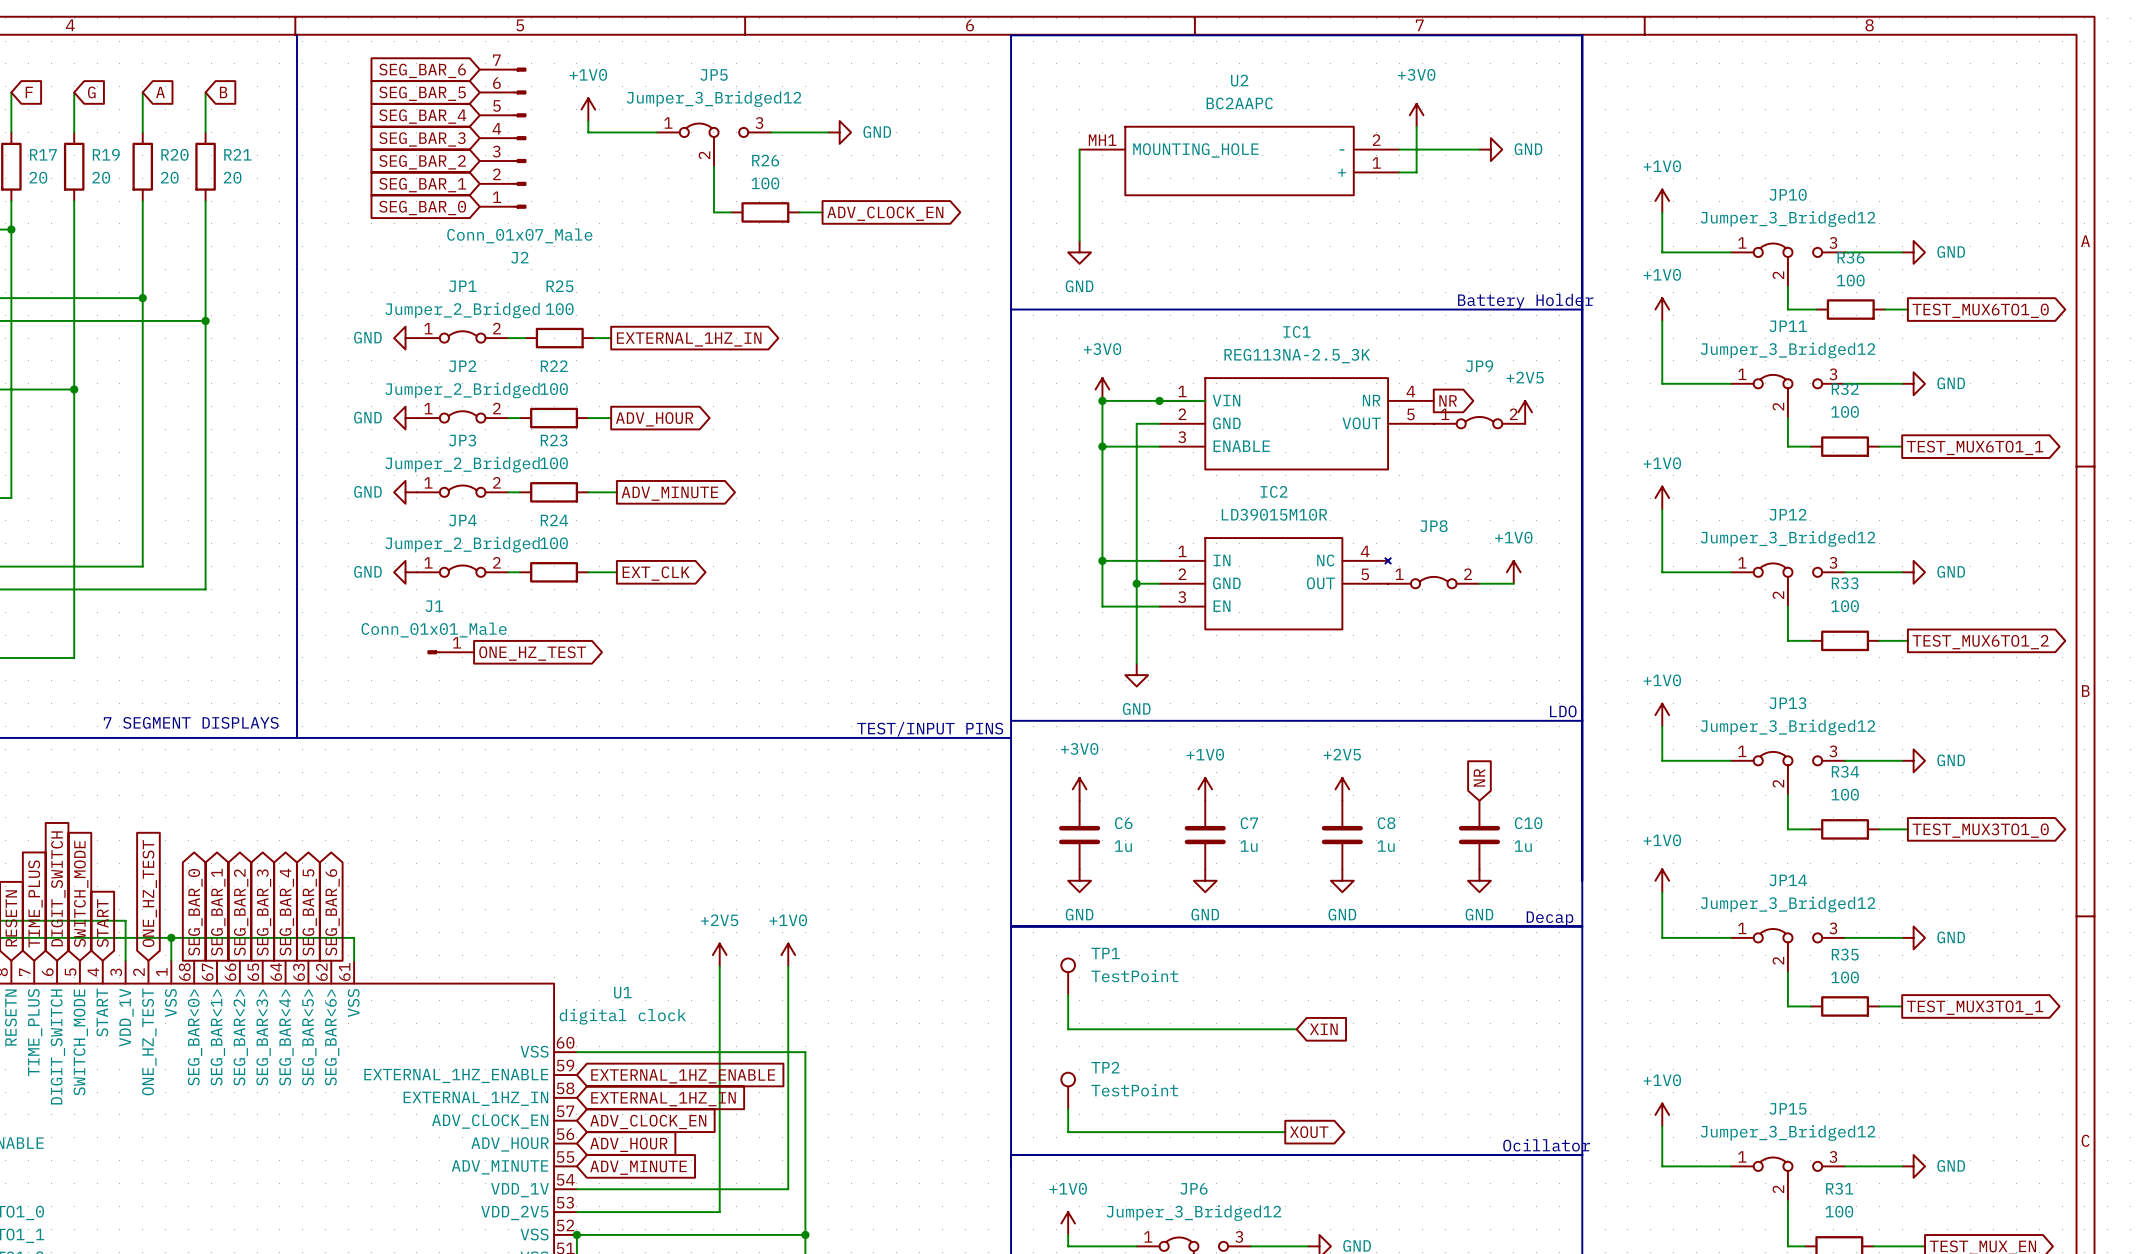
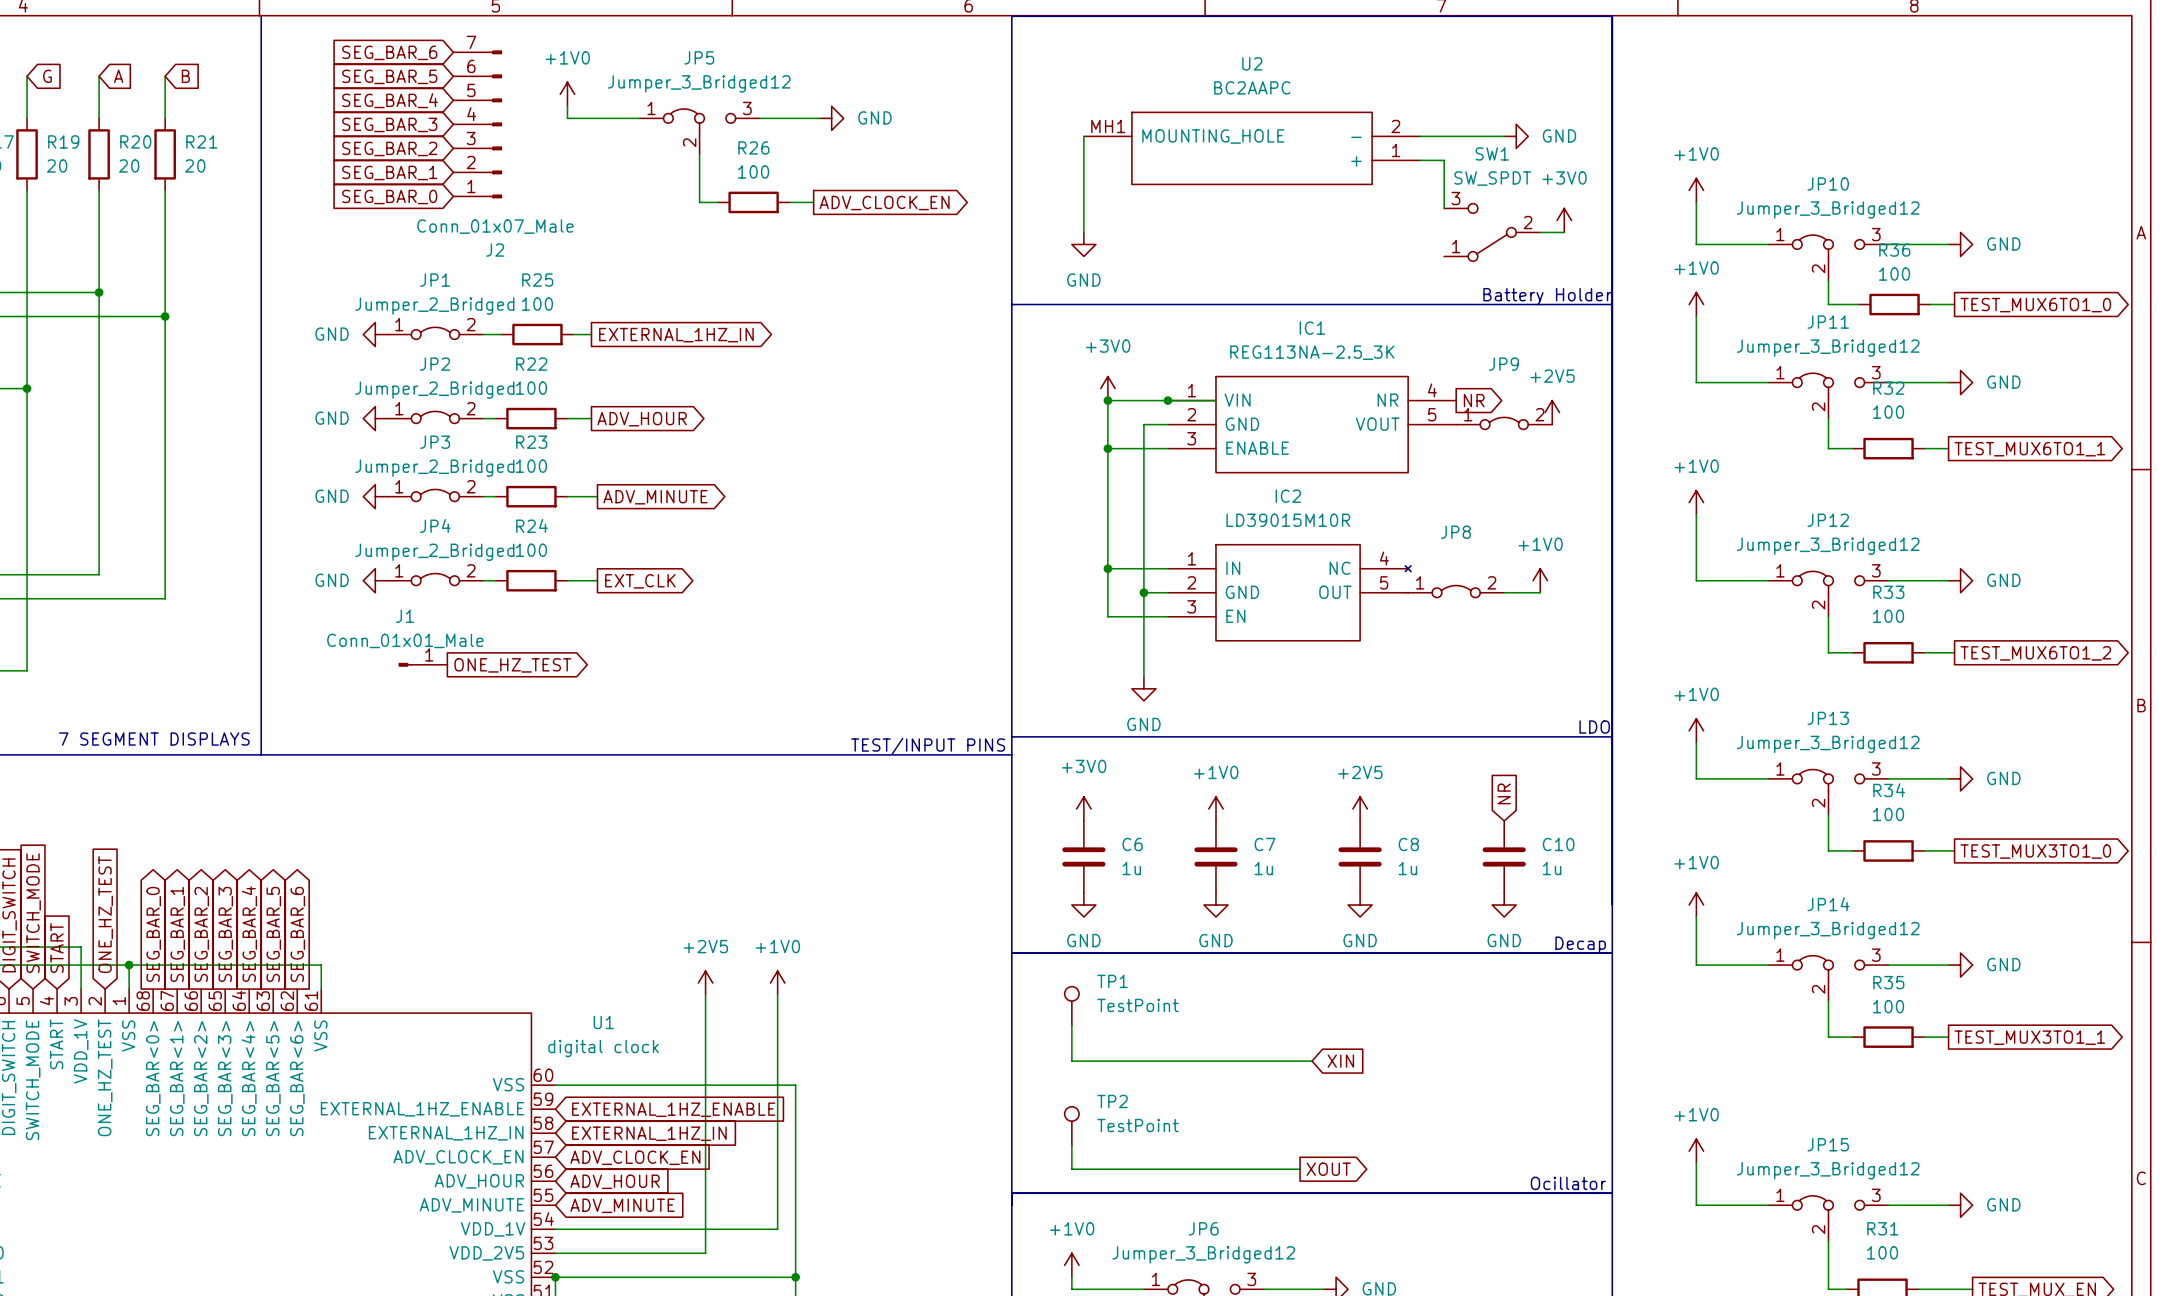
power symbol position: +3V0 (1416, 115) -> +3V0 (1564, 220)
wire: (1416, 126) (1416, 172) -> (1444, 208) (1444, 160) (1438, 160)
SW1: none -> SW_SPDT (1492, 232)
wire: none -> (1540, 232) (1564, 232)

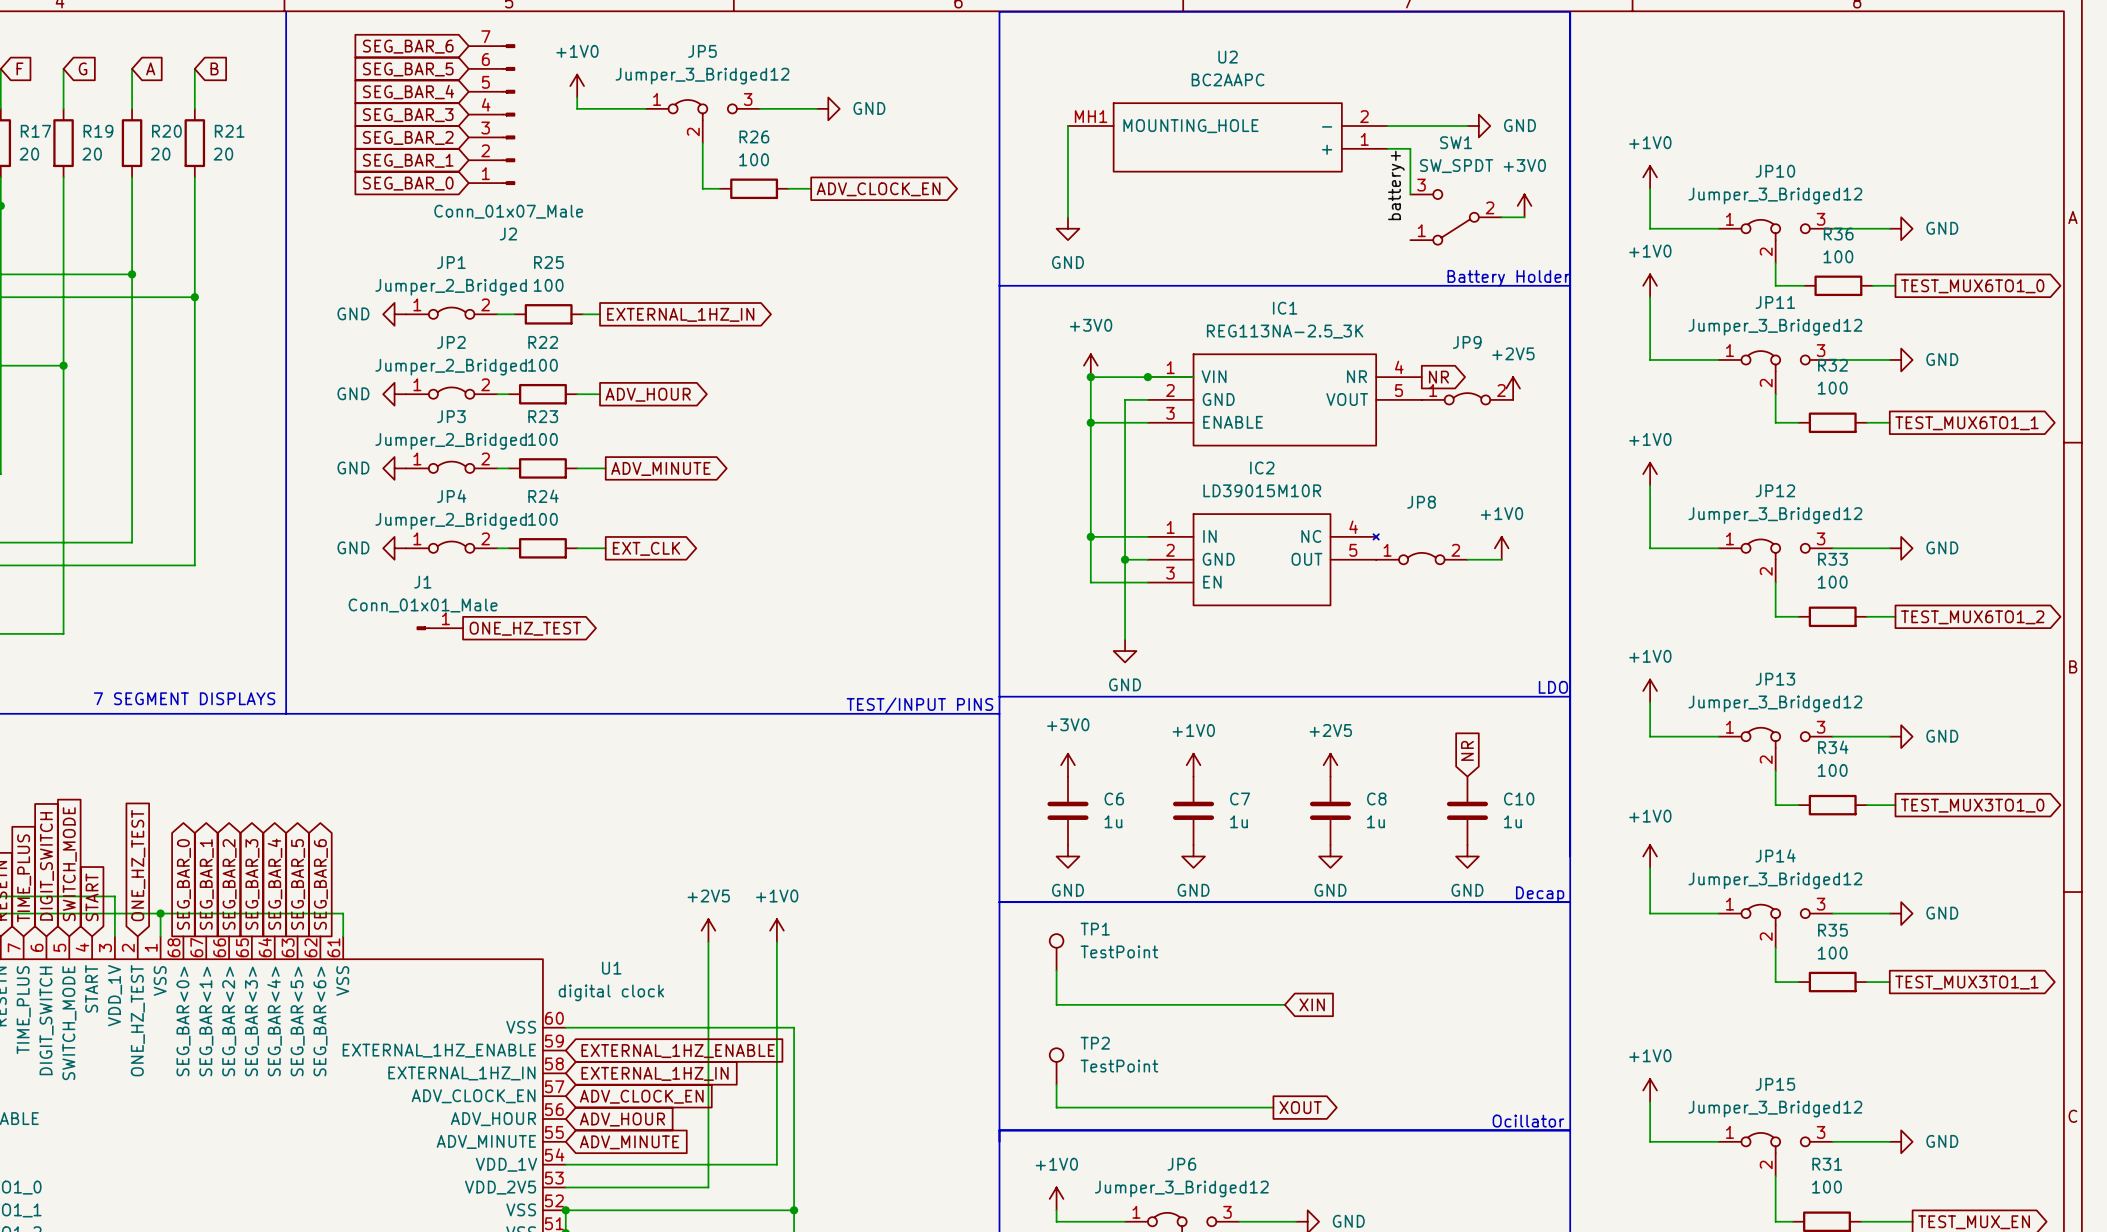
label: none -> battery+ (1396, 185)

